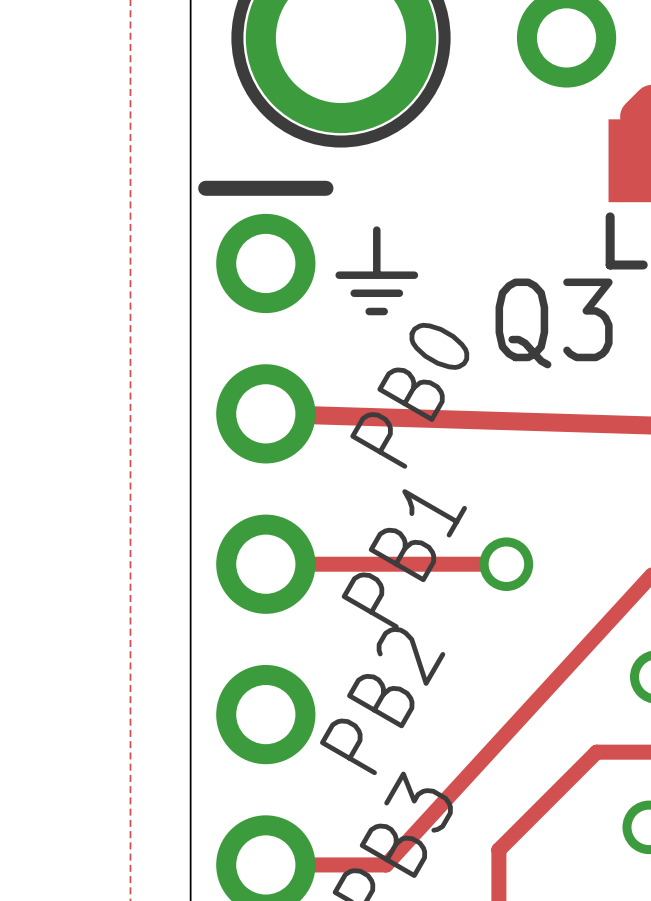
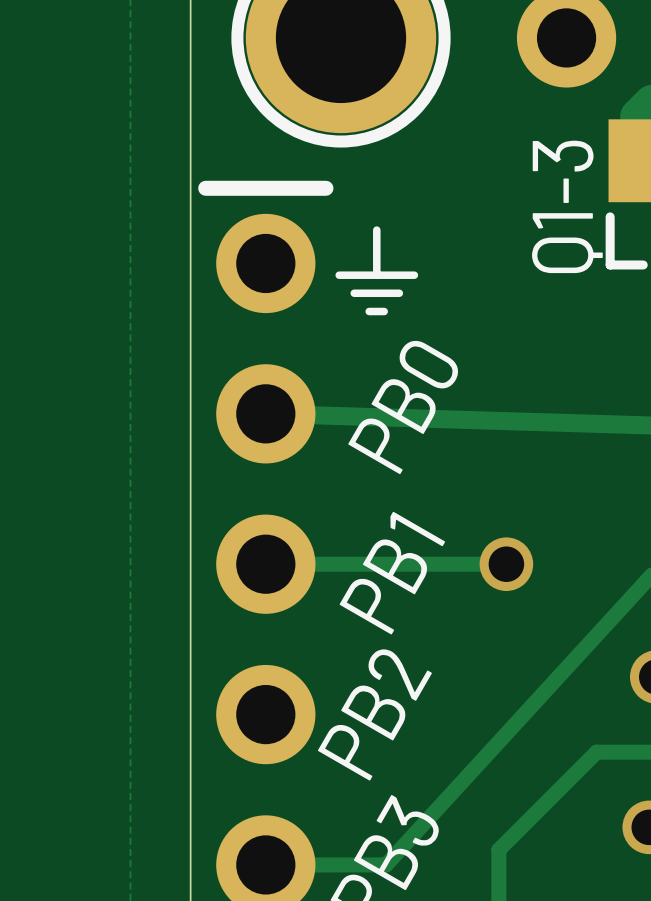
Q3 name: Q3 (554, 323) -> Q1-3 (567, 206)

